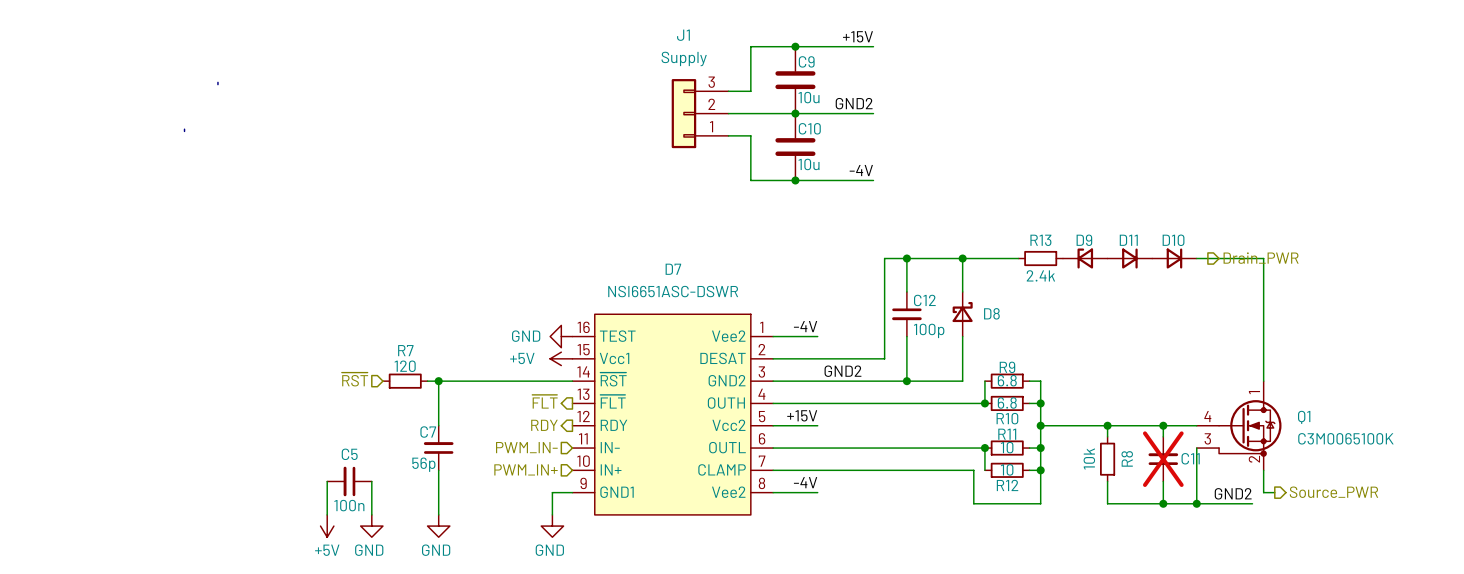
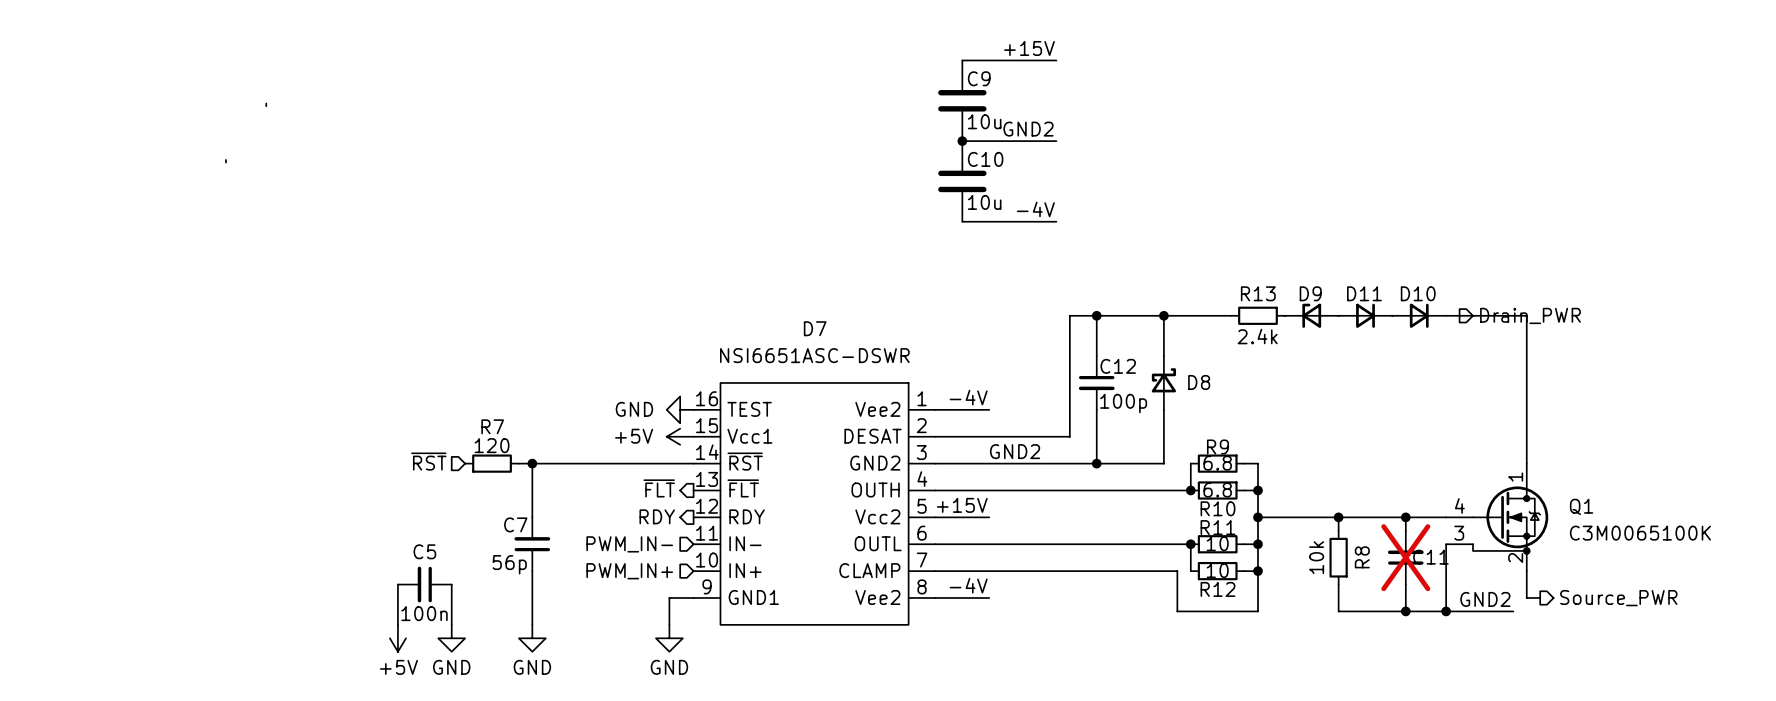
wire: (795, 46) (750, 46) (750, 91) (728, 91) -> none
junction: (795, 46) -> none
J1: Supply (700, 113) -> none
wire: (728, 113) (795, 113) -> none
wire: (728, 135) (750, 135) (750, 180) (795, 180) -> none
junction: (795, 180) -> none

